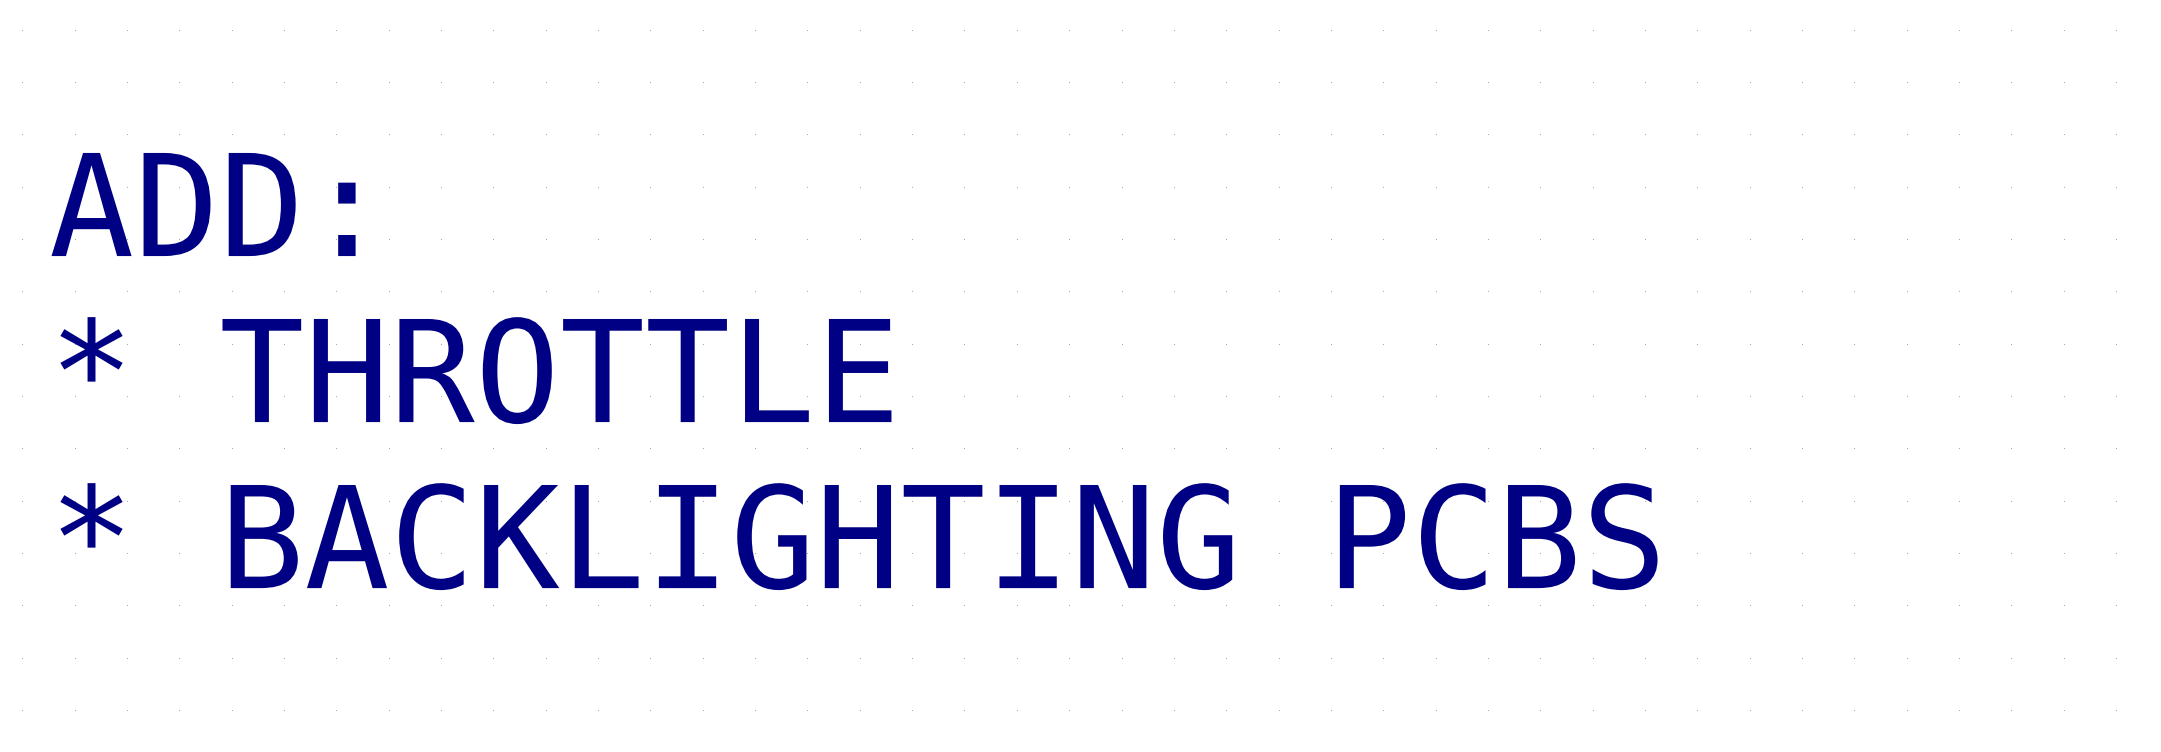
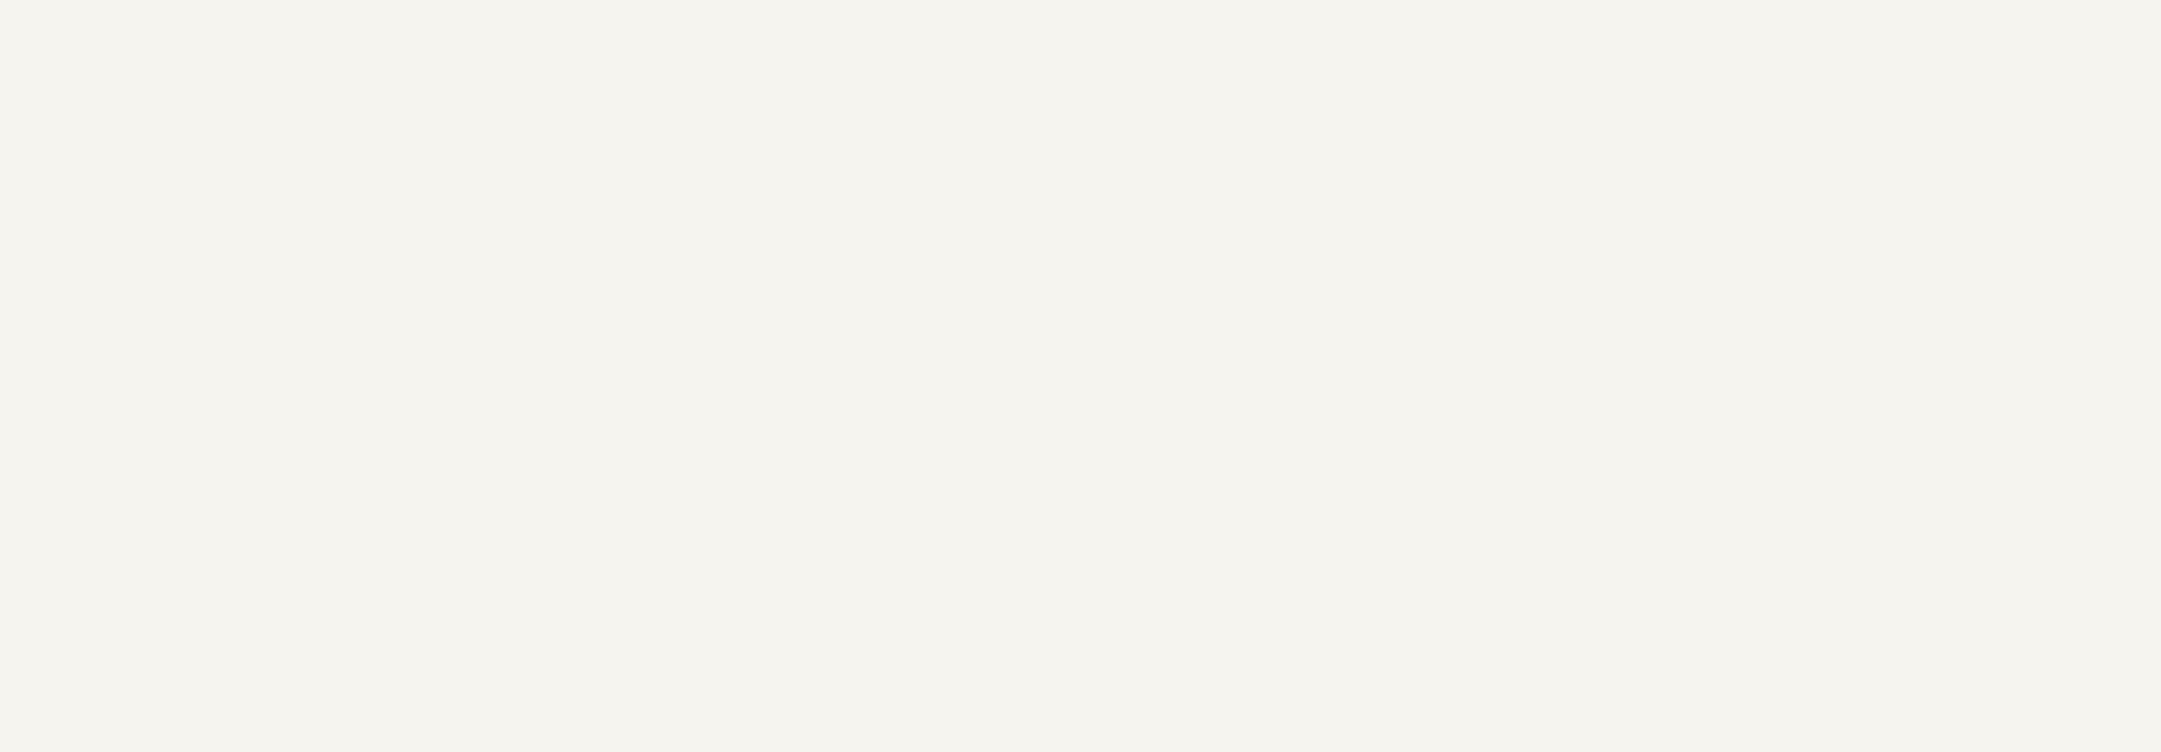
text: ADD: (203, 204) -> none
text: * THROTTLE (475, 370) -> none
text: * BACKLIGHTING PCBS (858, 536) -> none

